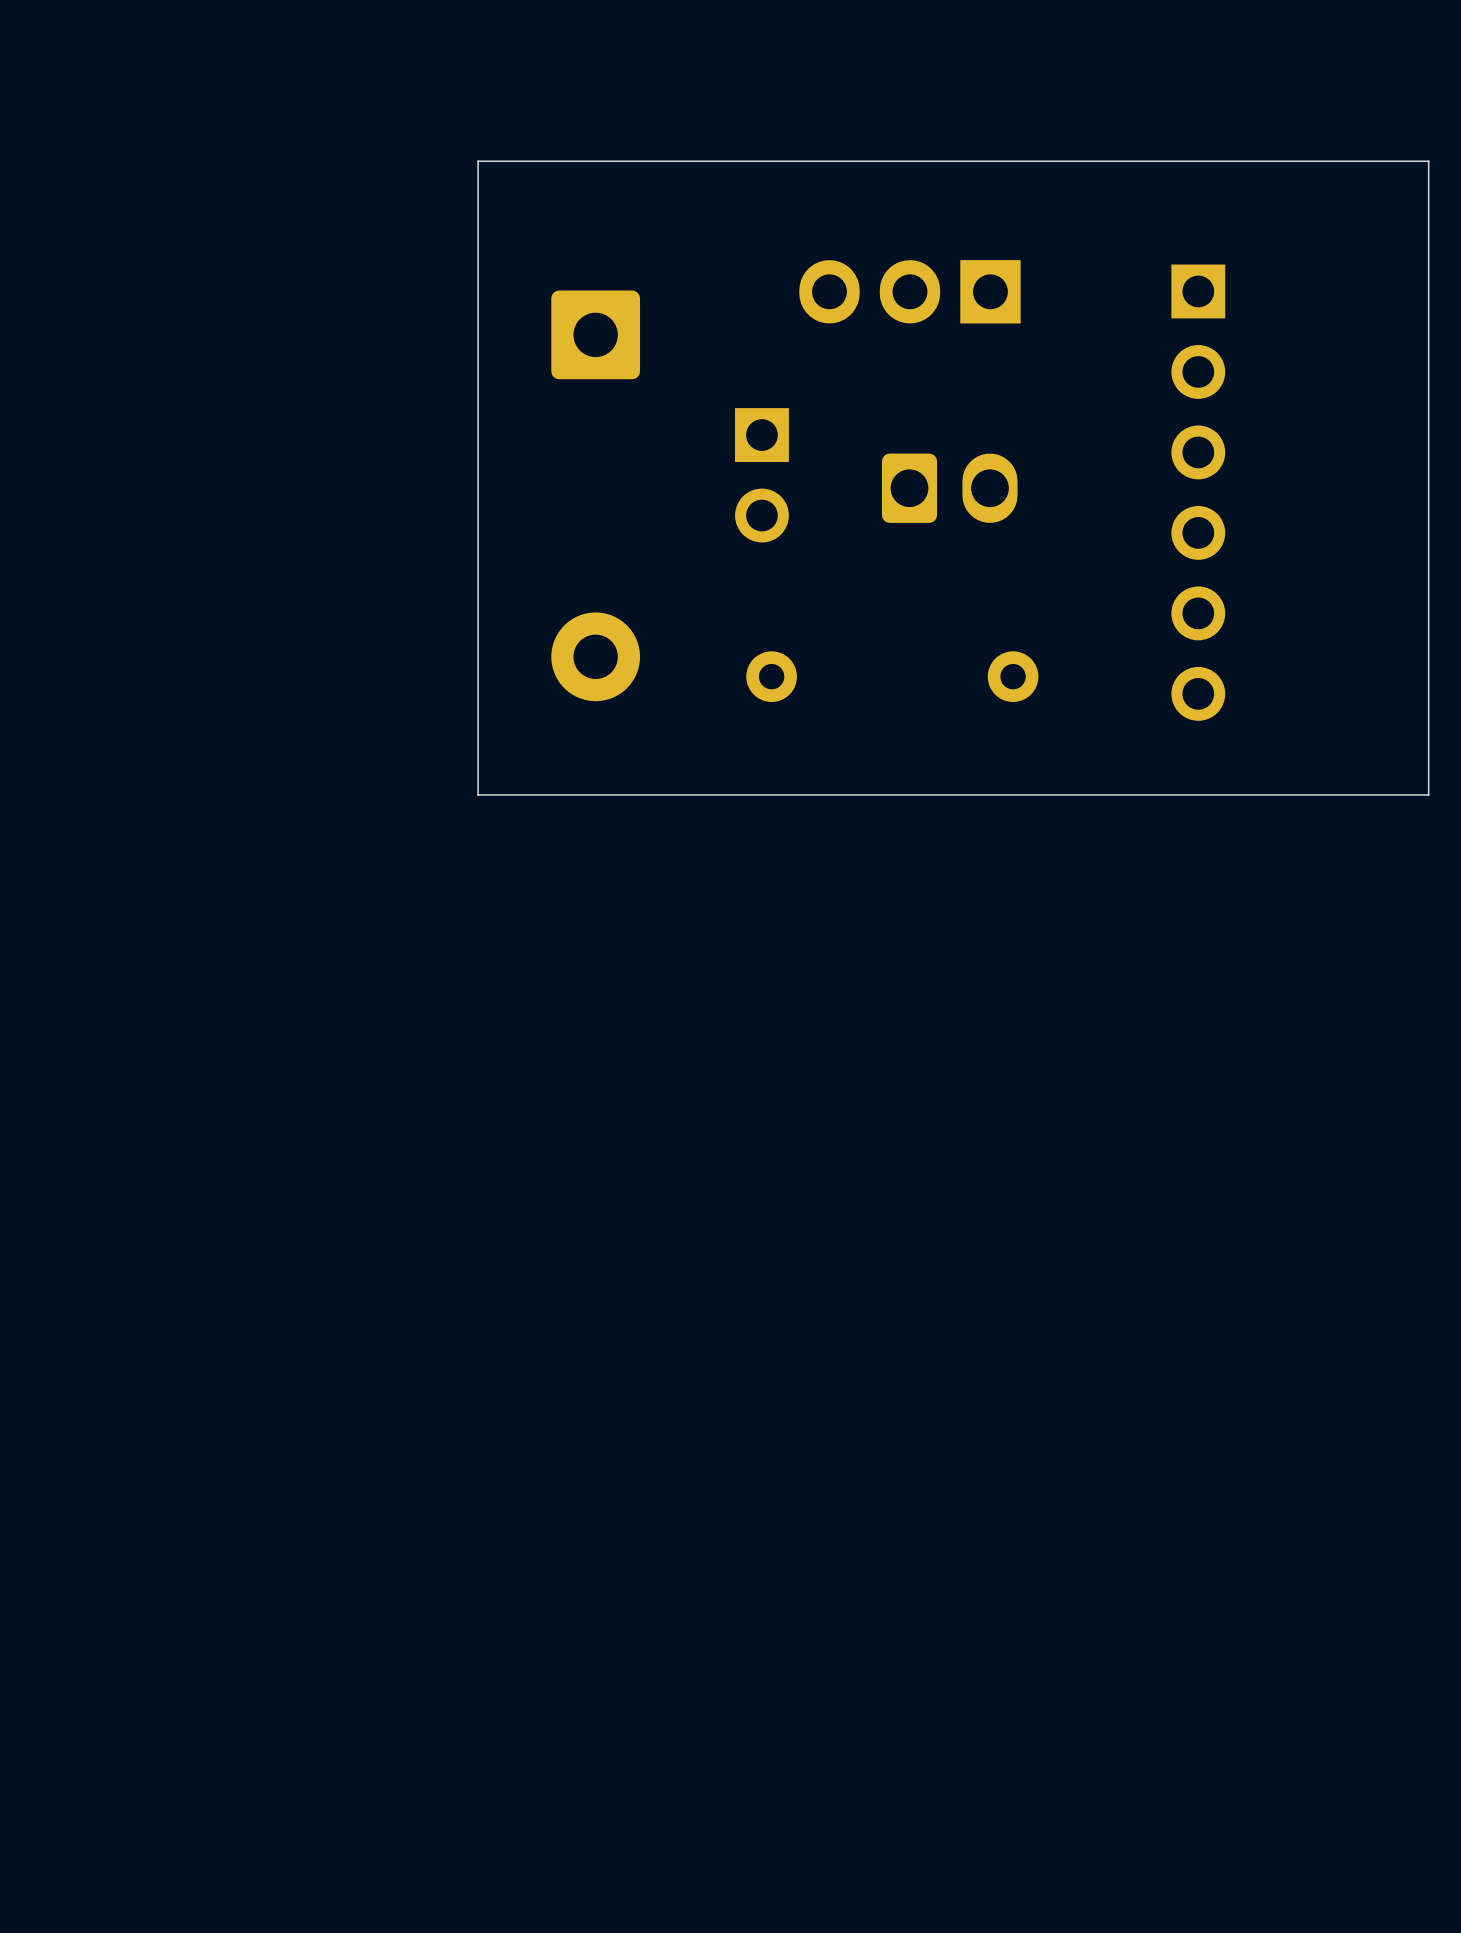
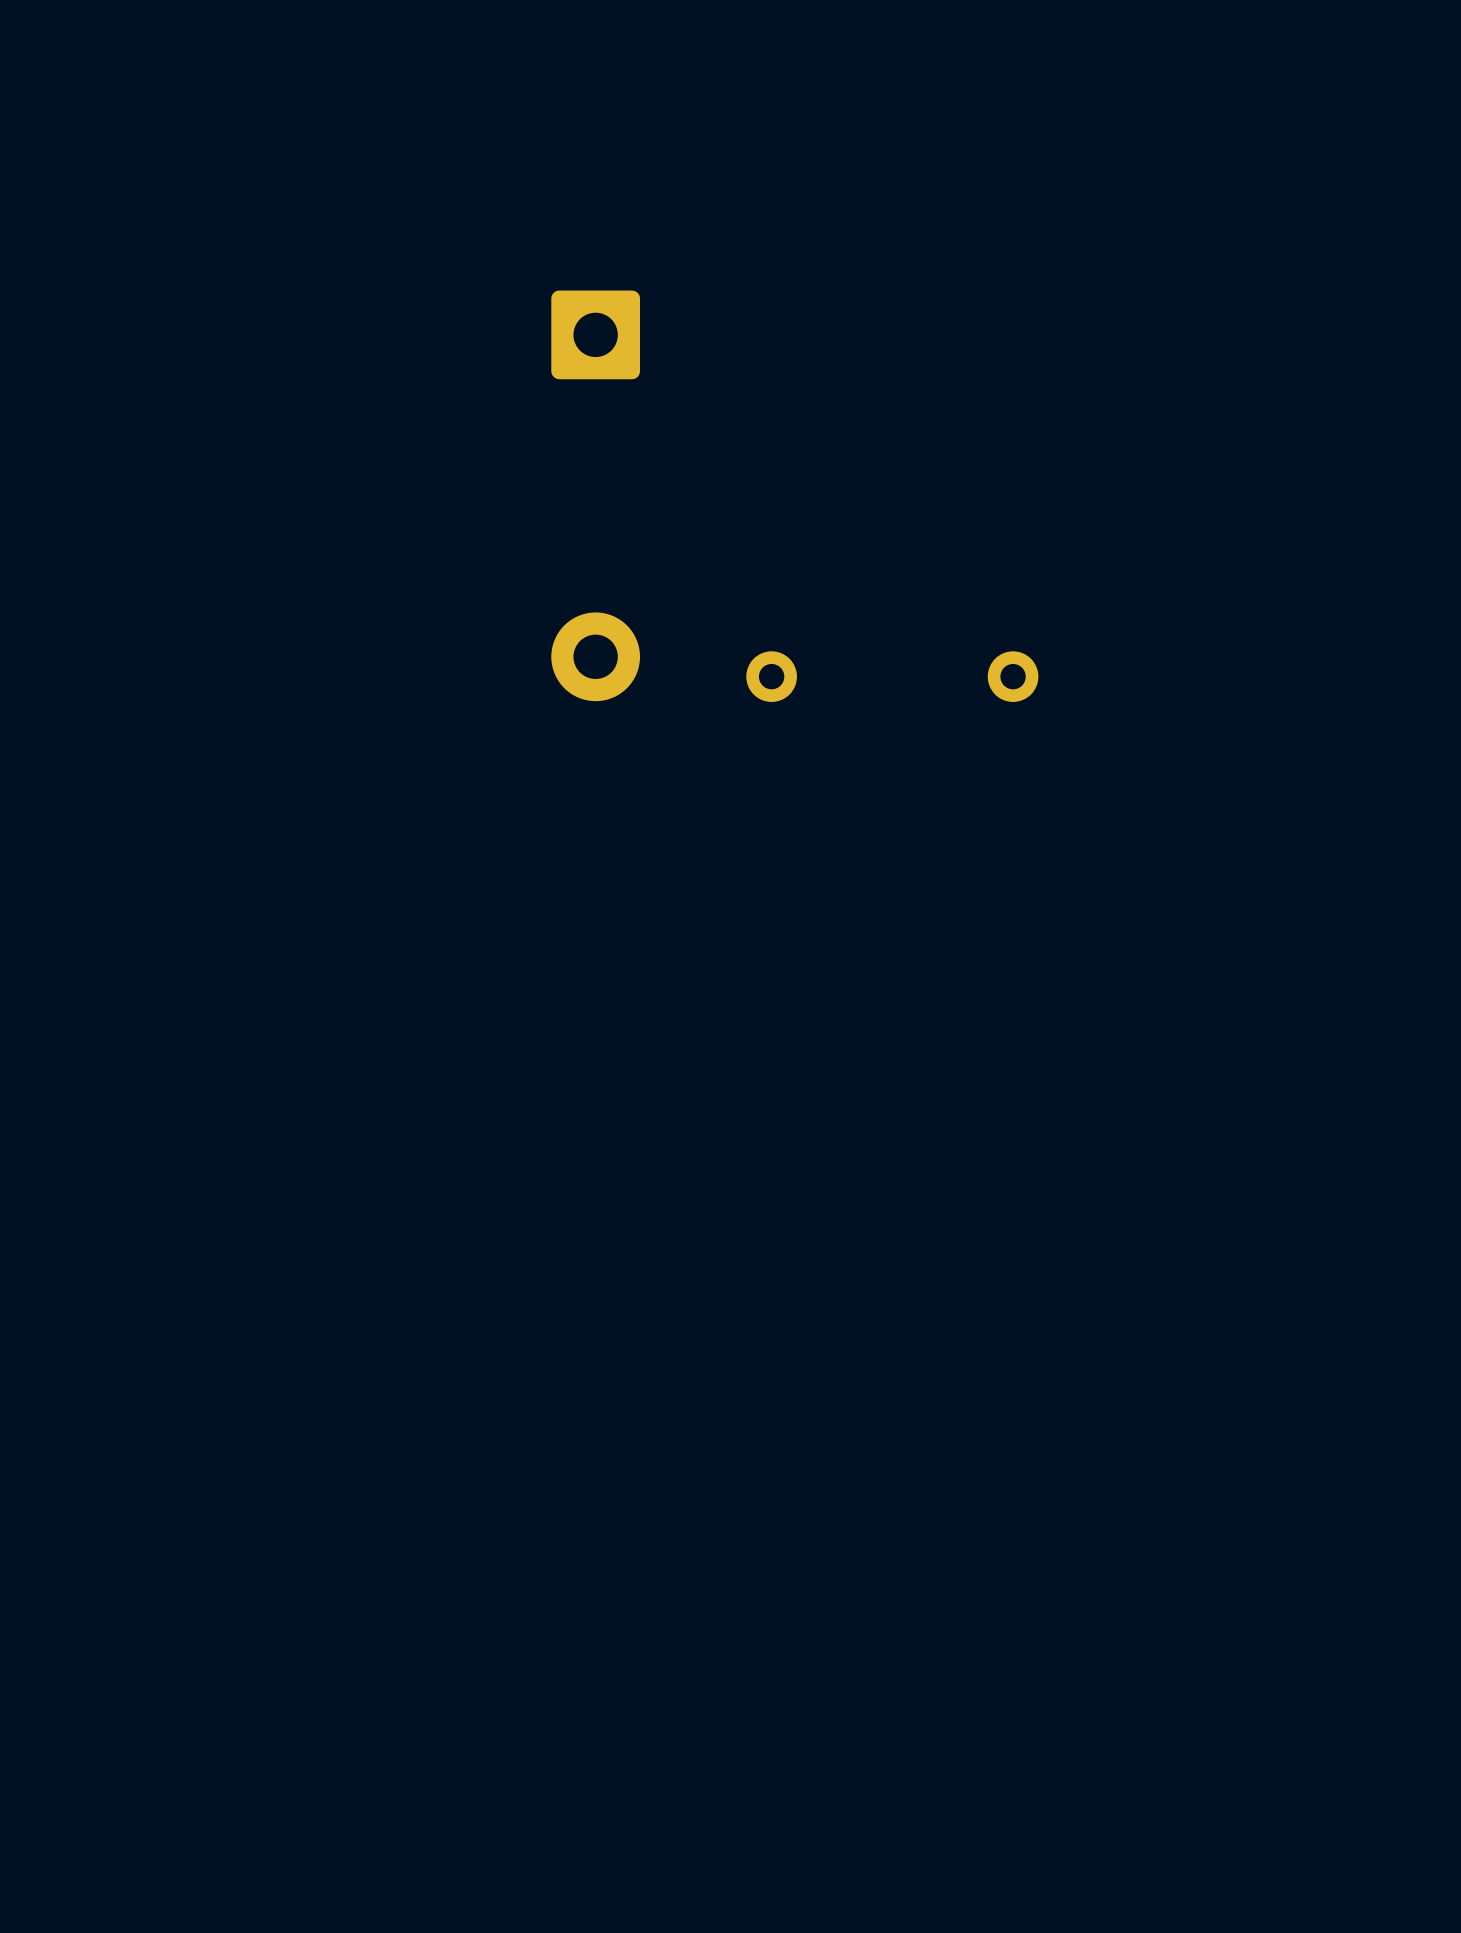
board edge: (1428, 161) (1428, 794) (478, 794) (478, 161) (1428, 161) -> none
part: (909, 291) -> none
part: (761, 475) -> none
part: (949, 488) -> none
part: (1198, 492) -> none

